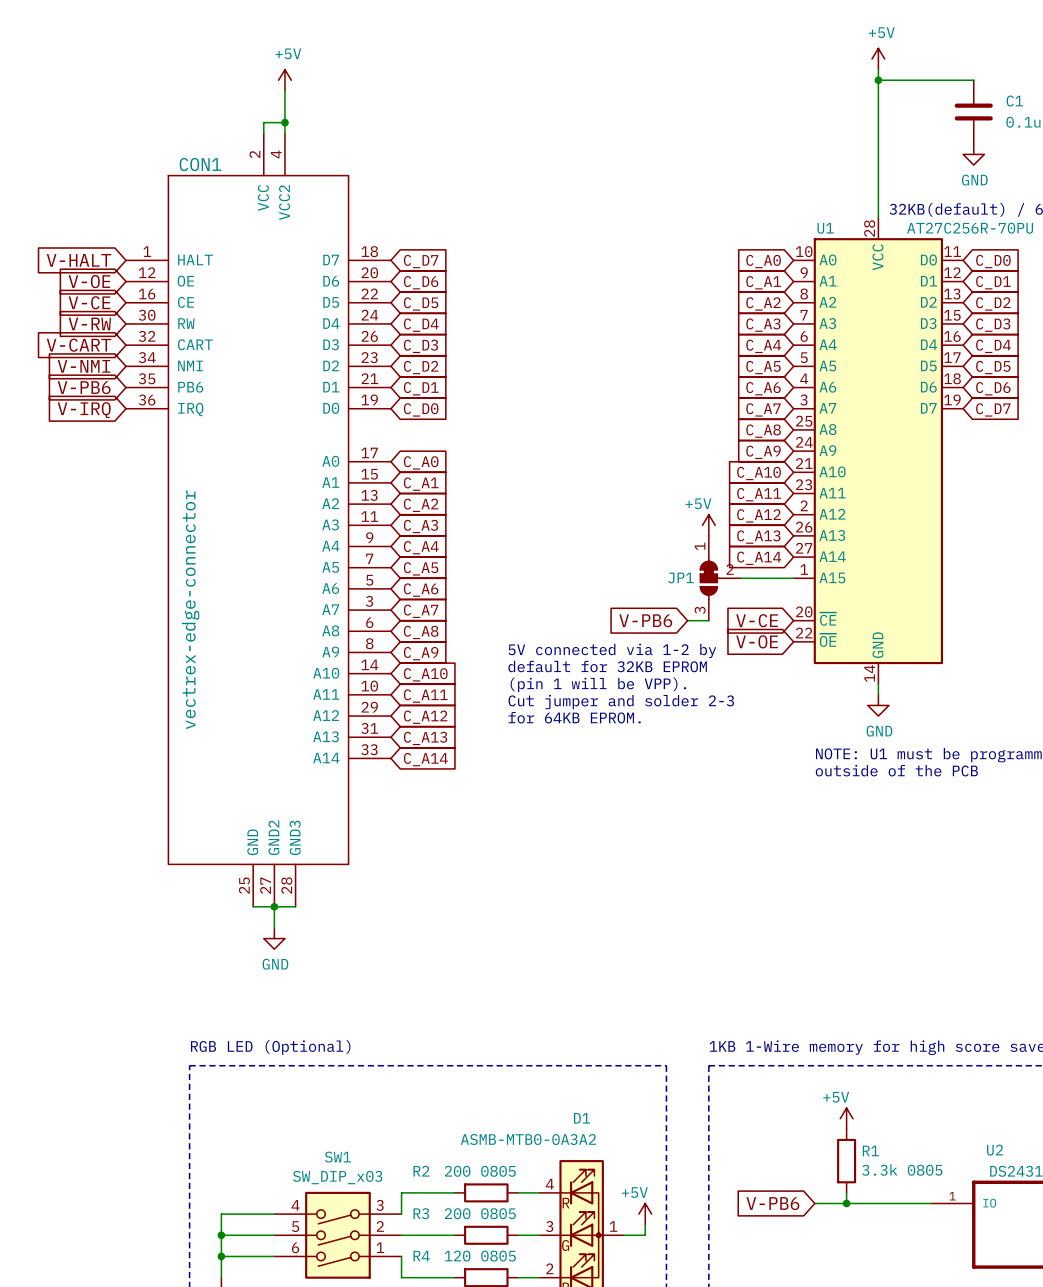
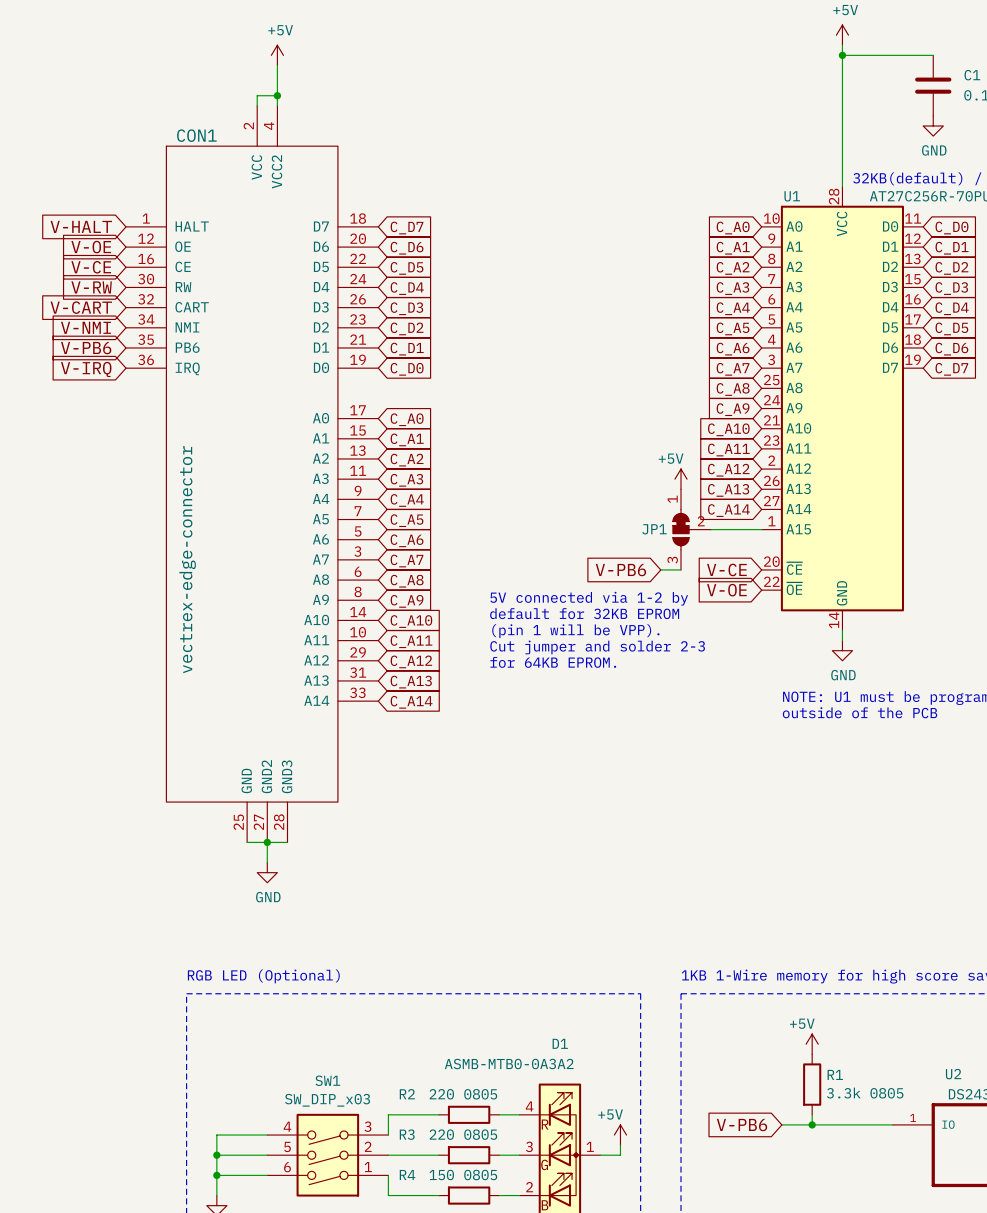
R2 value: 200 0805 (480, 1171) -> 220 0805 (463, 1094)
R3 value: 200 0805 (480, 1213) -> 220 0805 (463, 1134)
R4 value: 120 0805 (480, 1256) -> 150 0805 (463, 1175)

